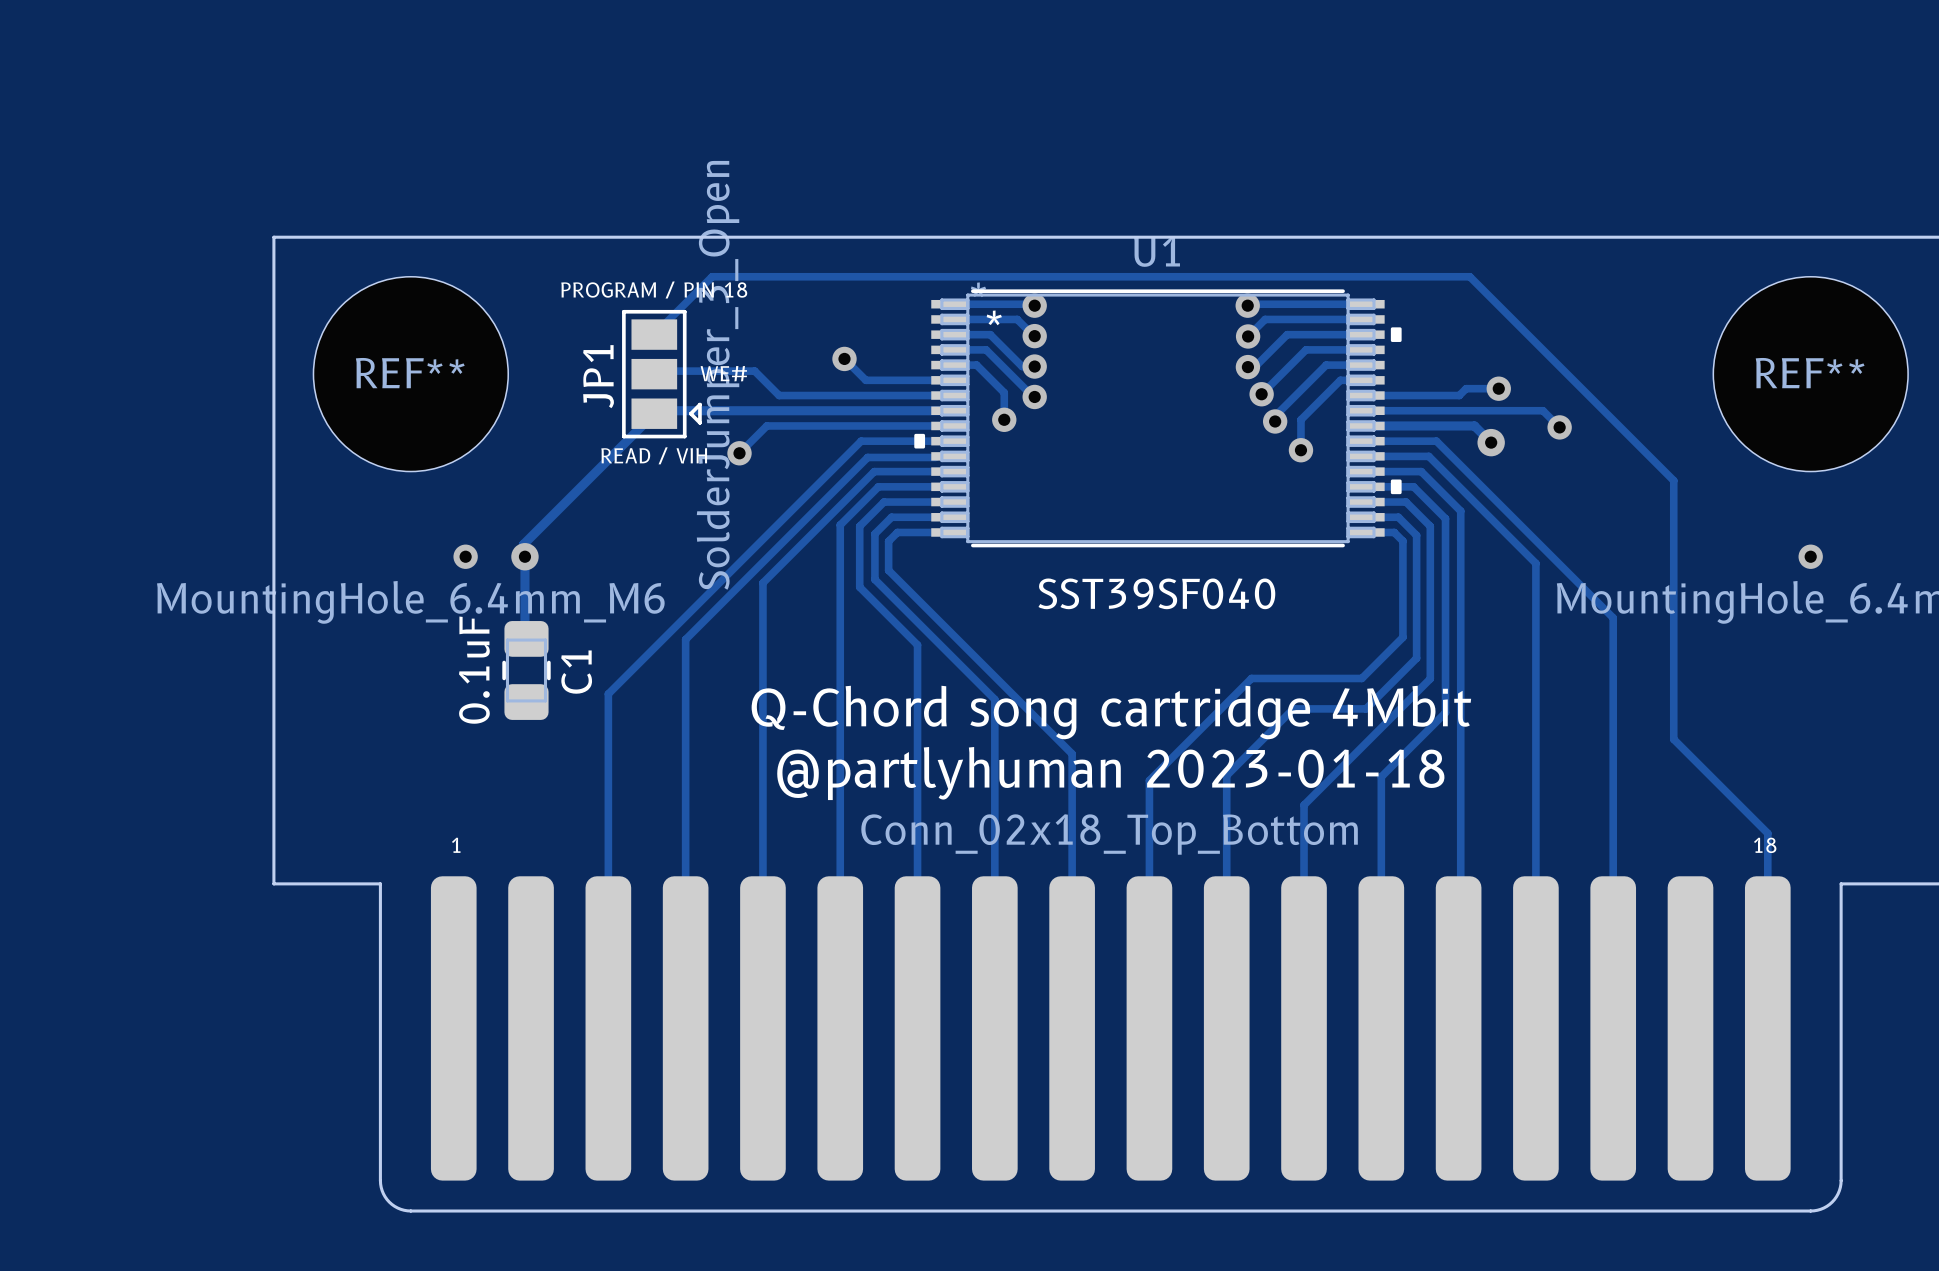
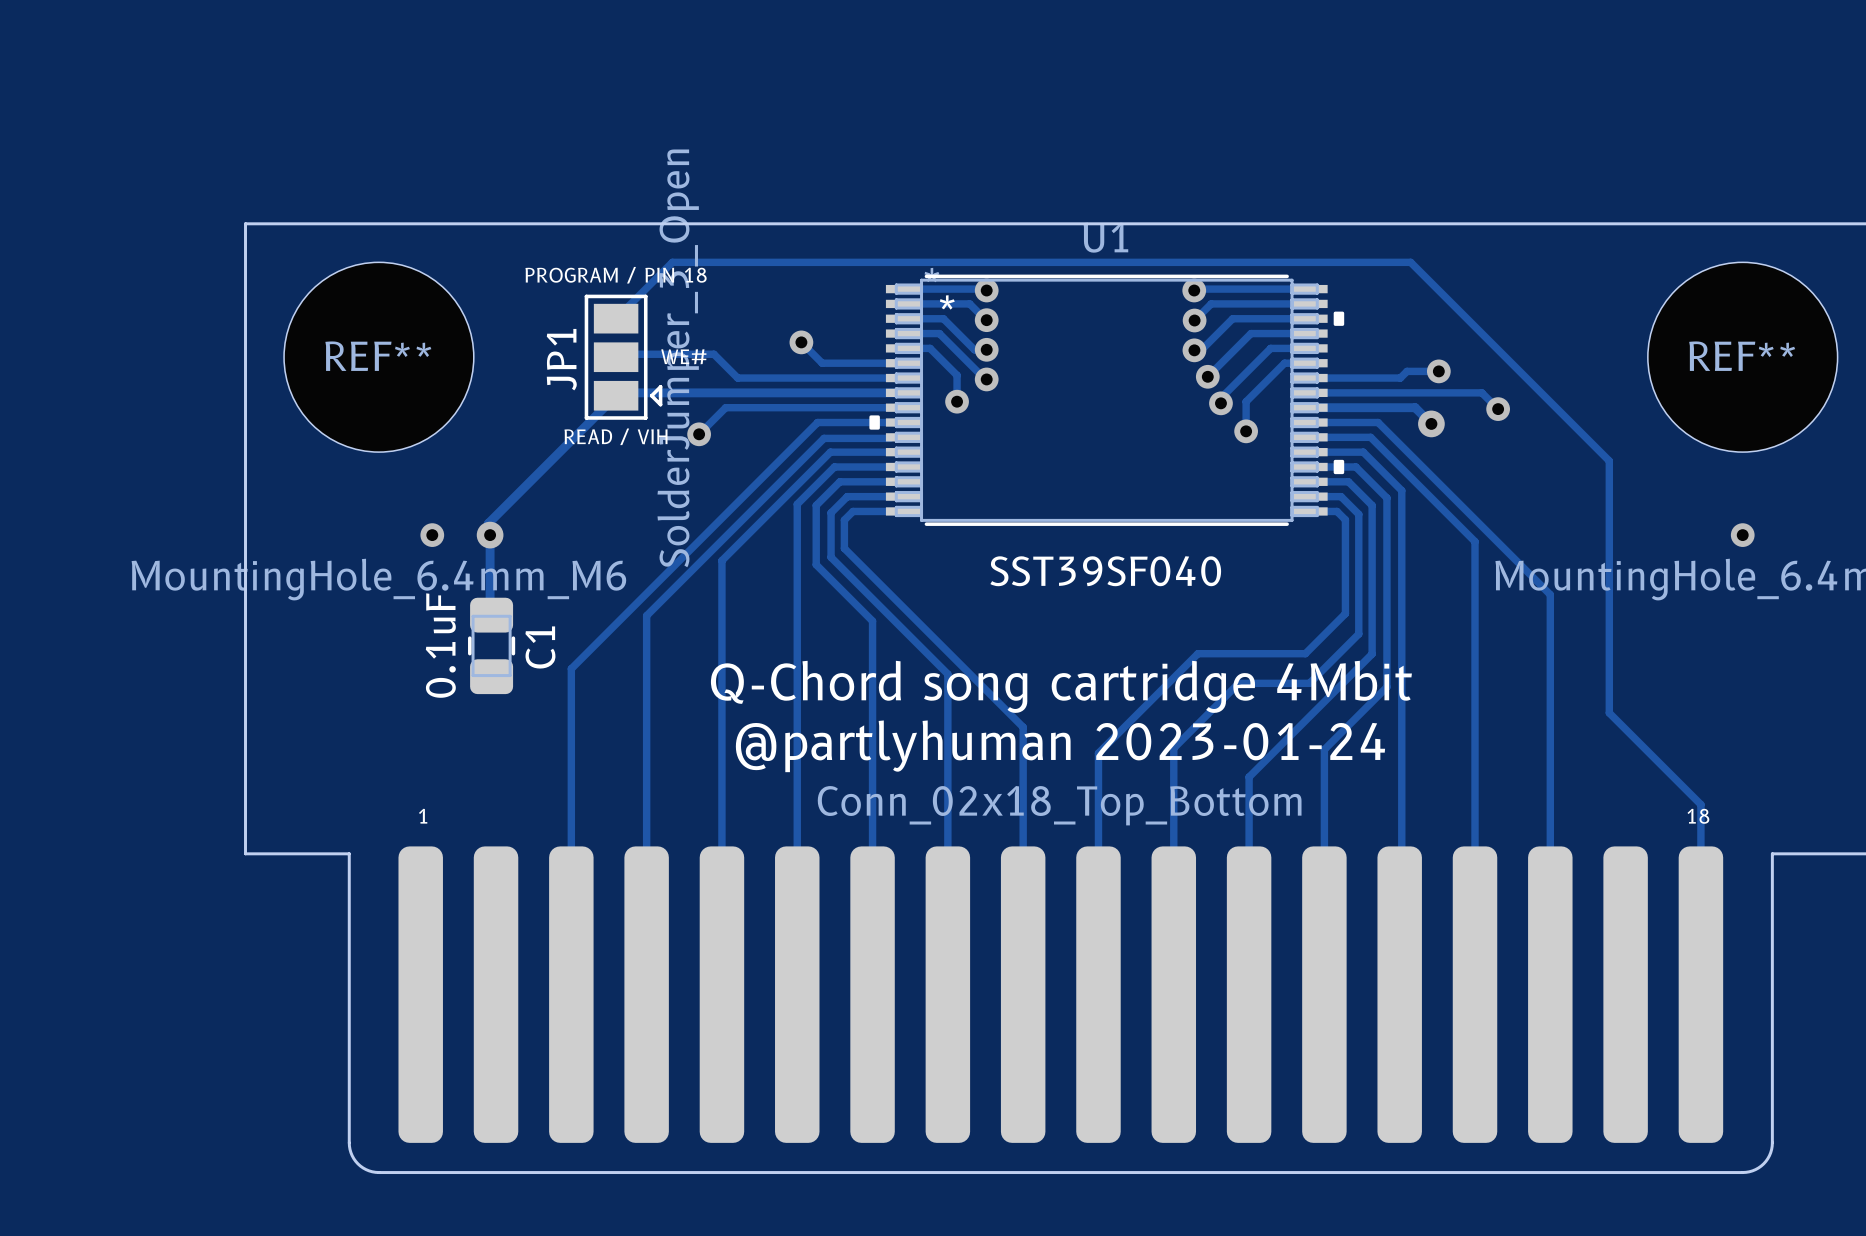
text: @partlyhuman 2023-01-18 (1110, 773) -> @partlyhuman 2023-01-24 (1060, 746)

